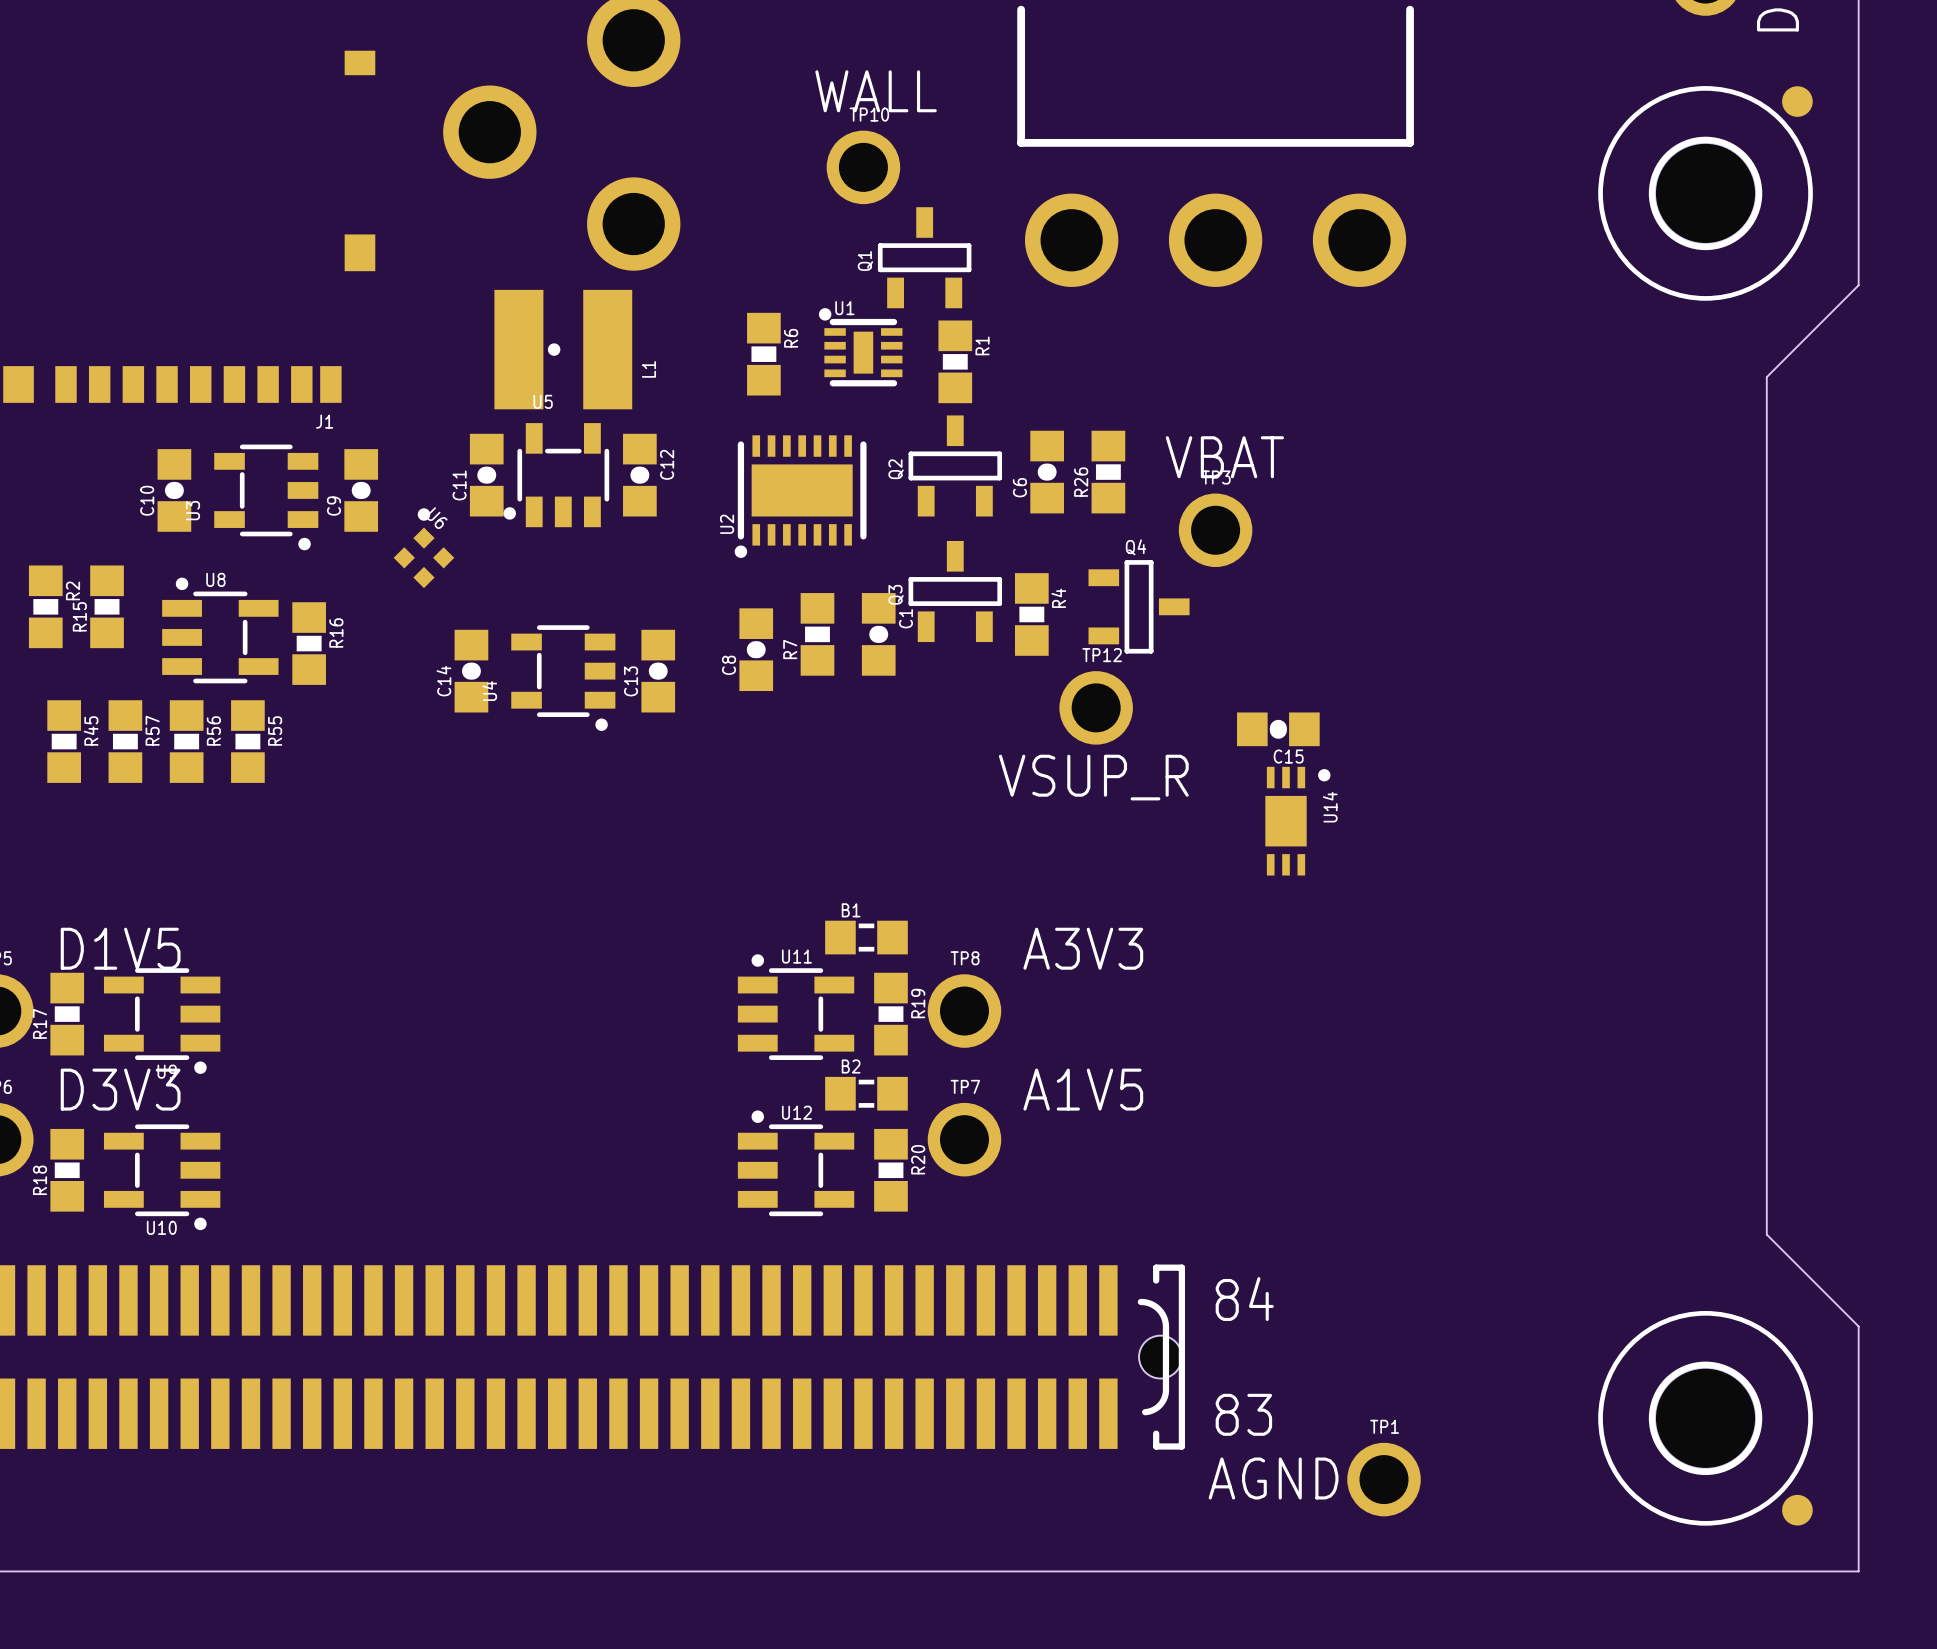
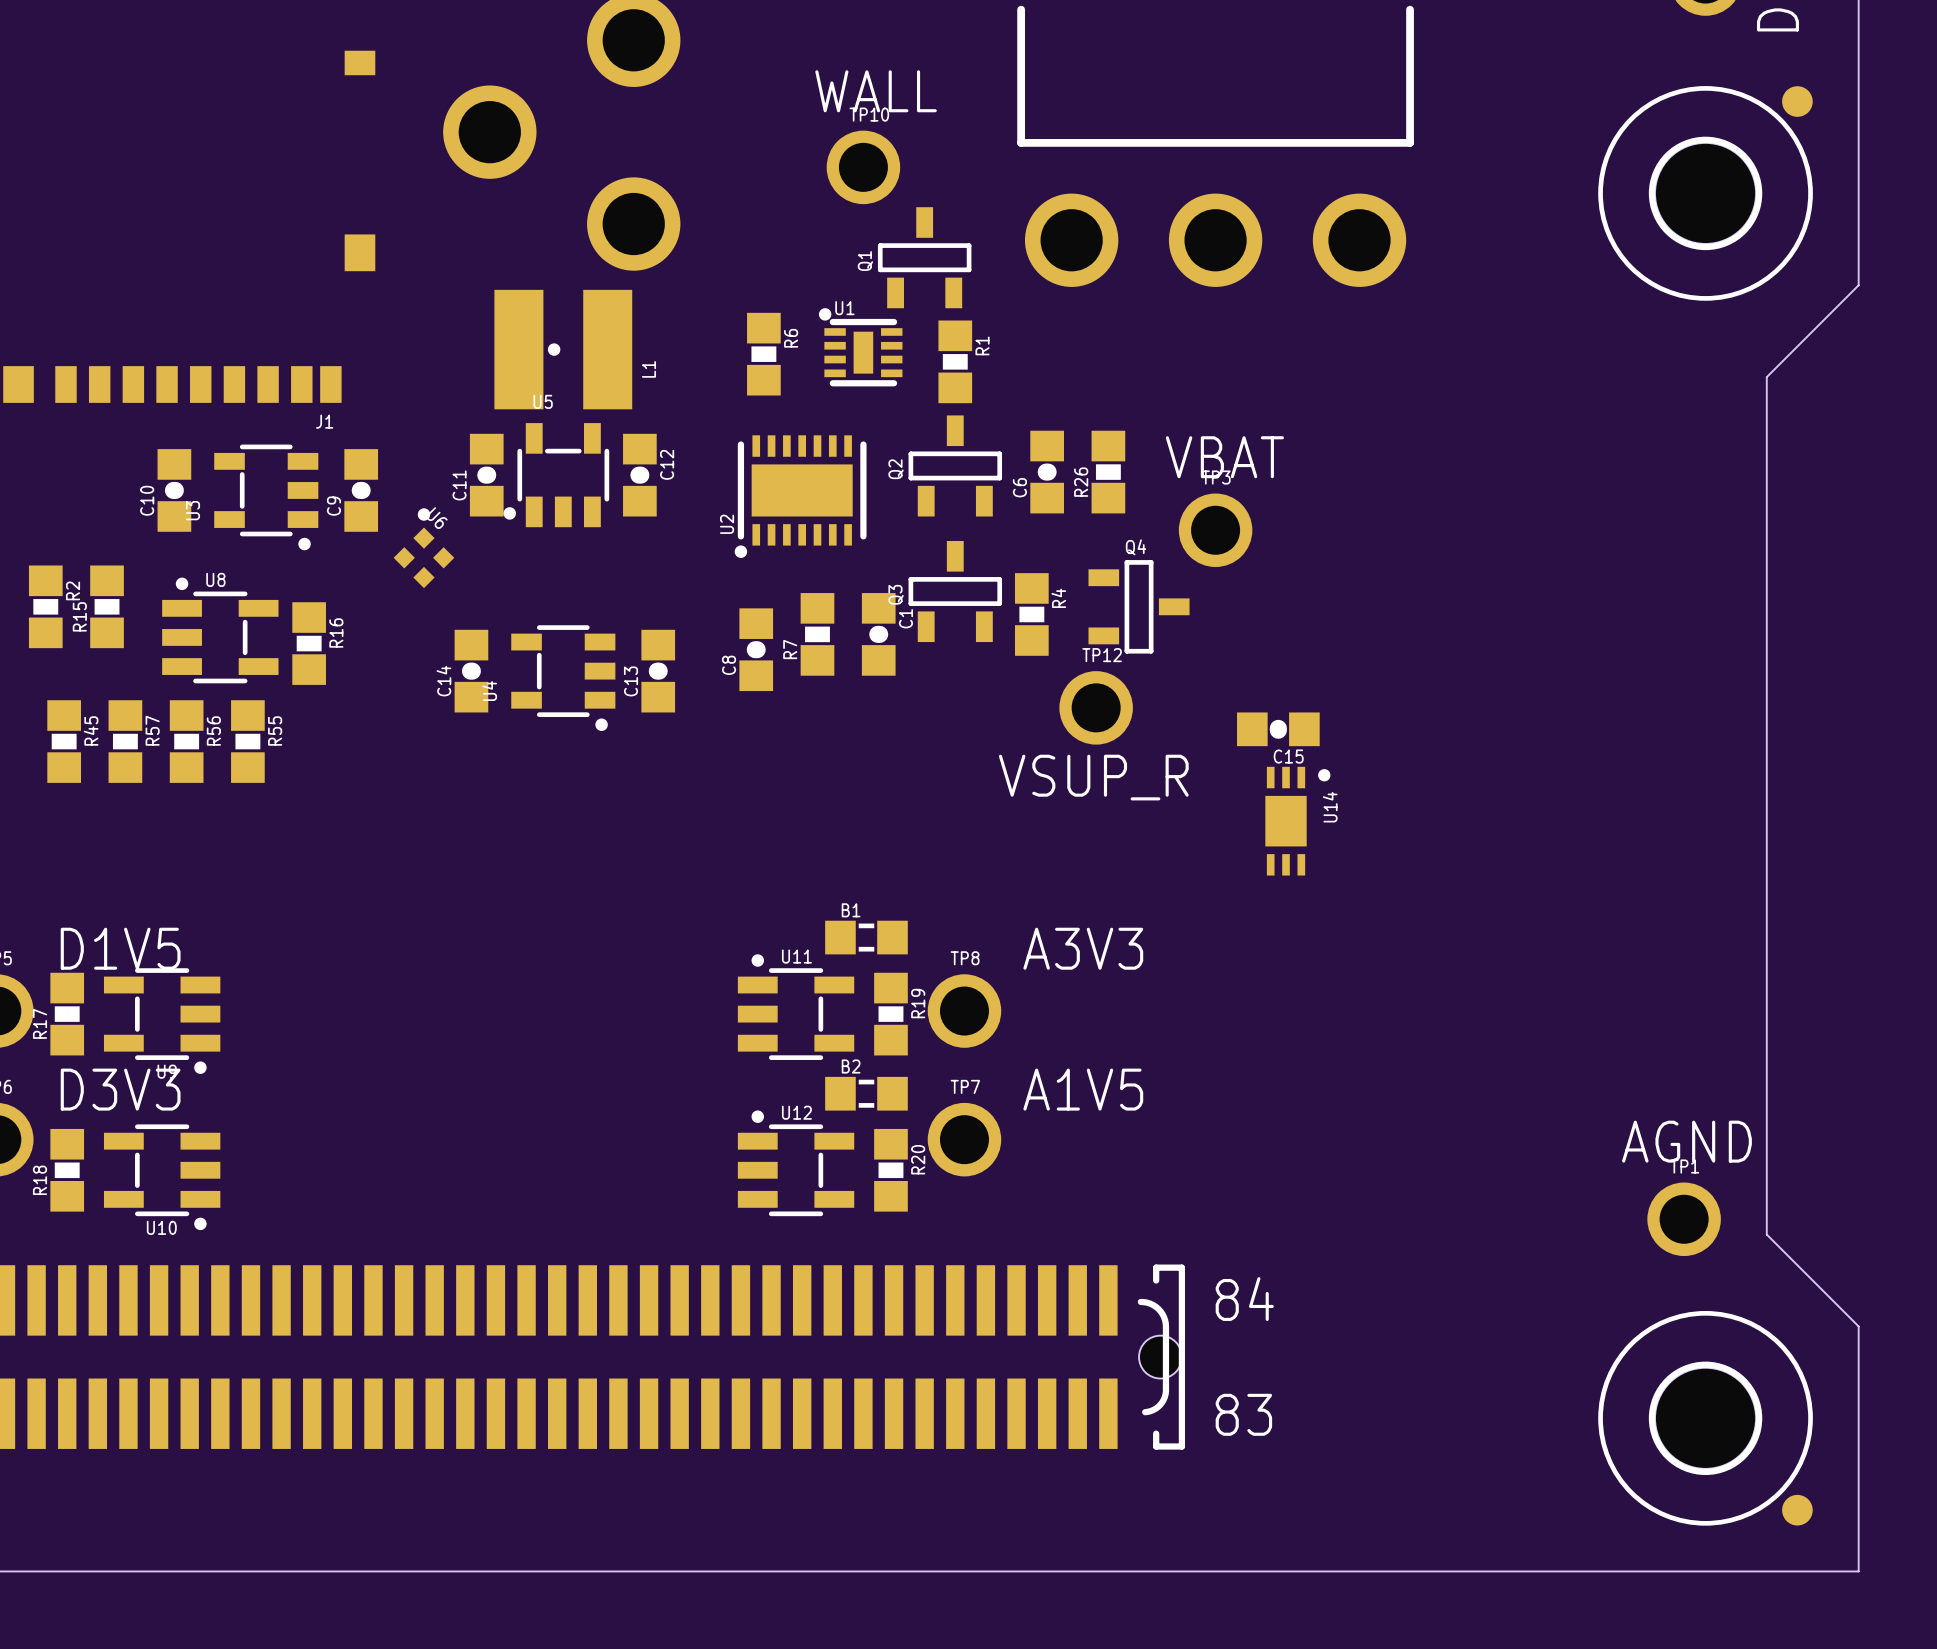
text position: AGND (1273, 1478) -> AGND (1686, 1141)
TP1 position: (1384, 1479) -> (1684, 1219)

